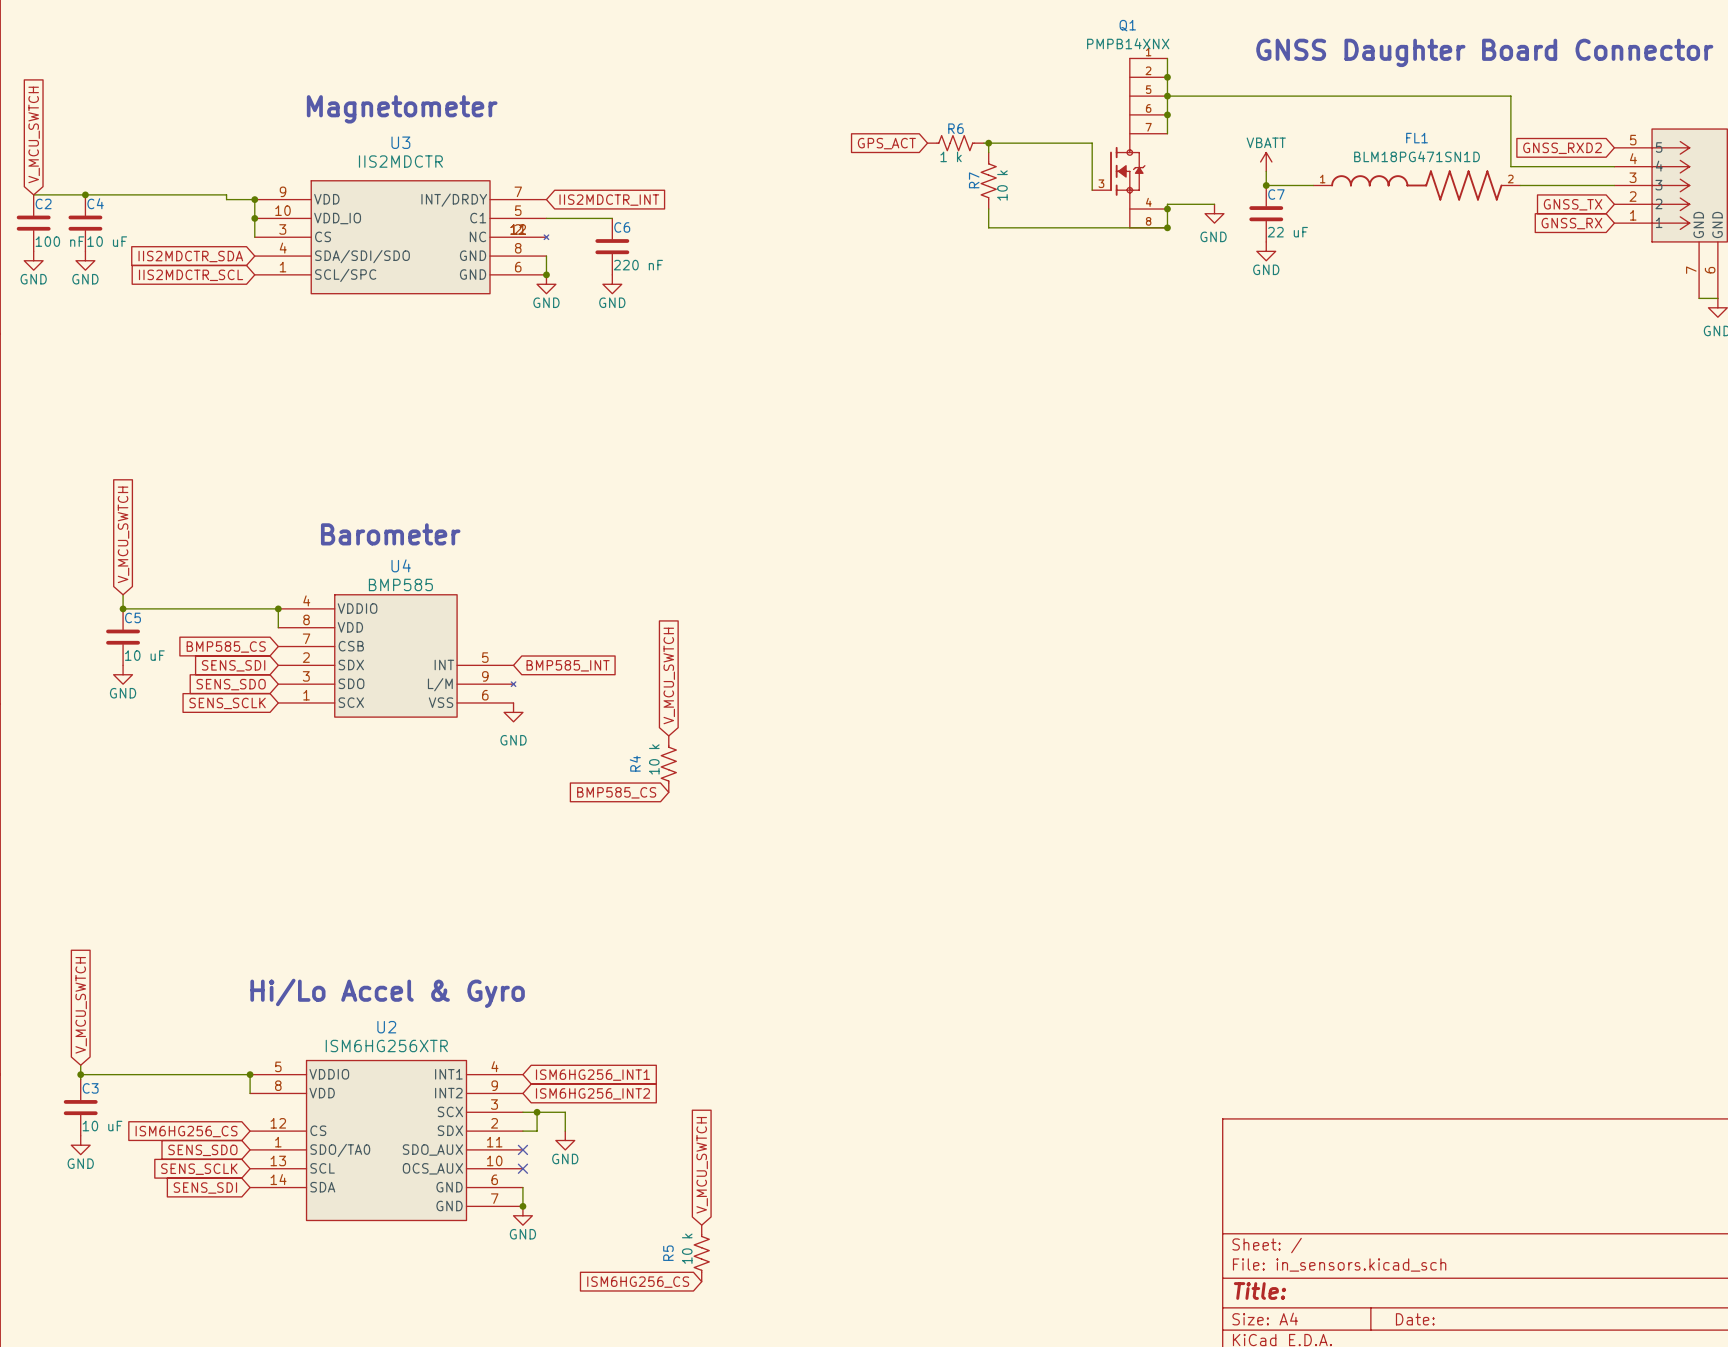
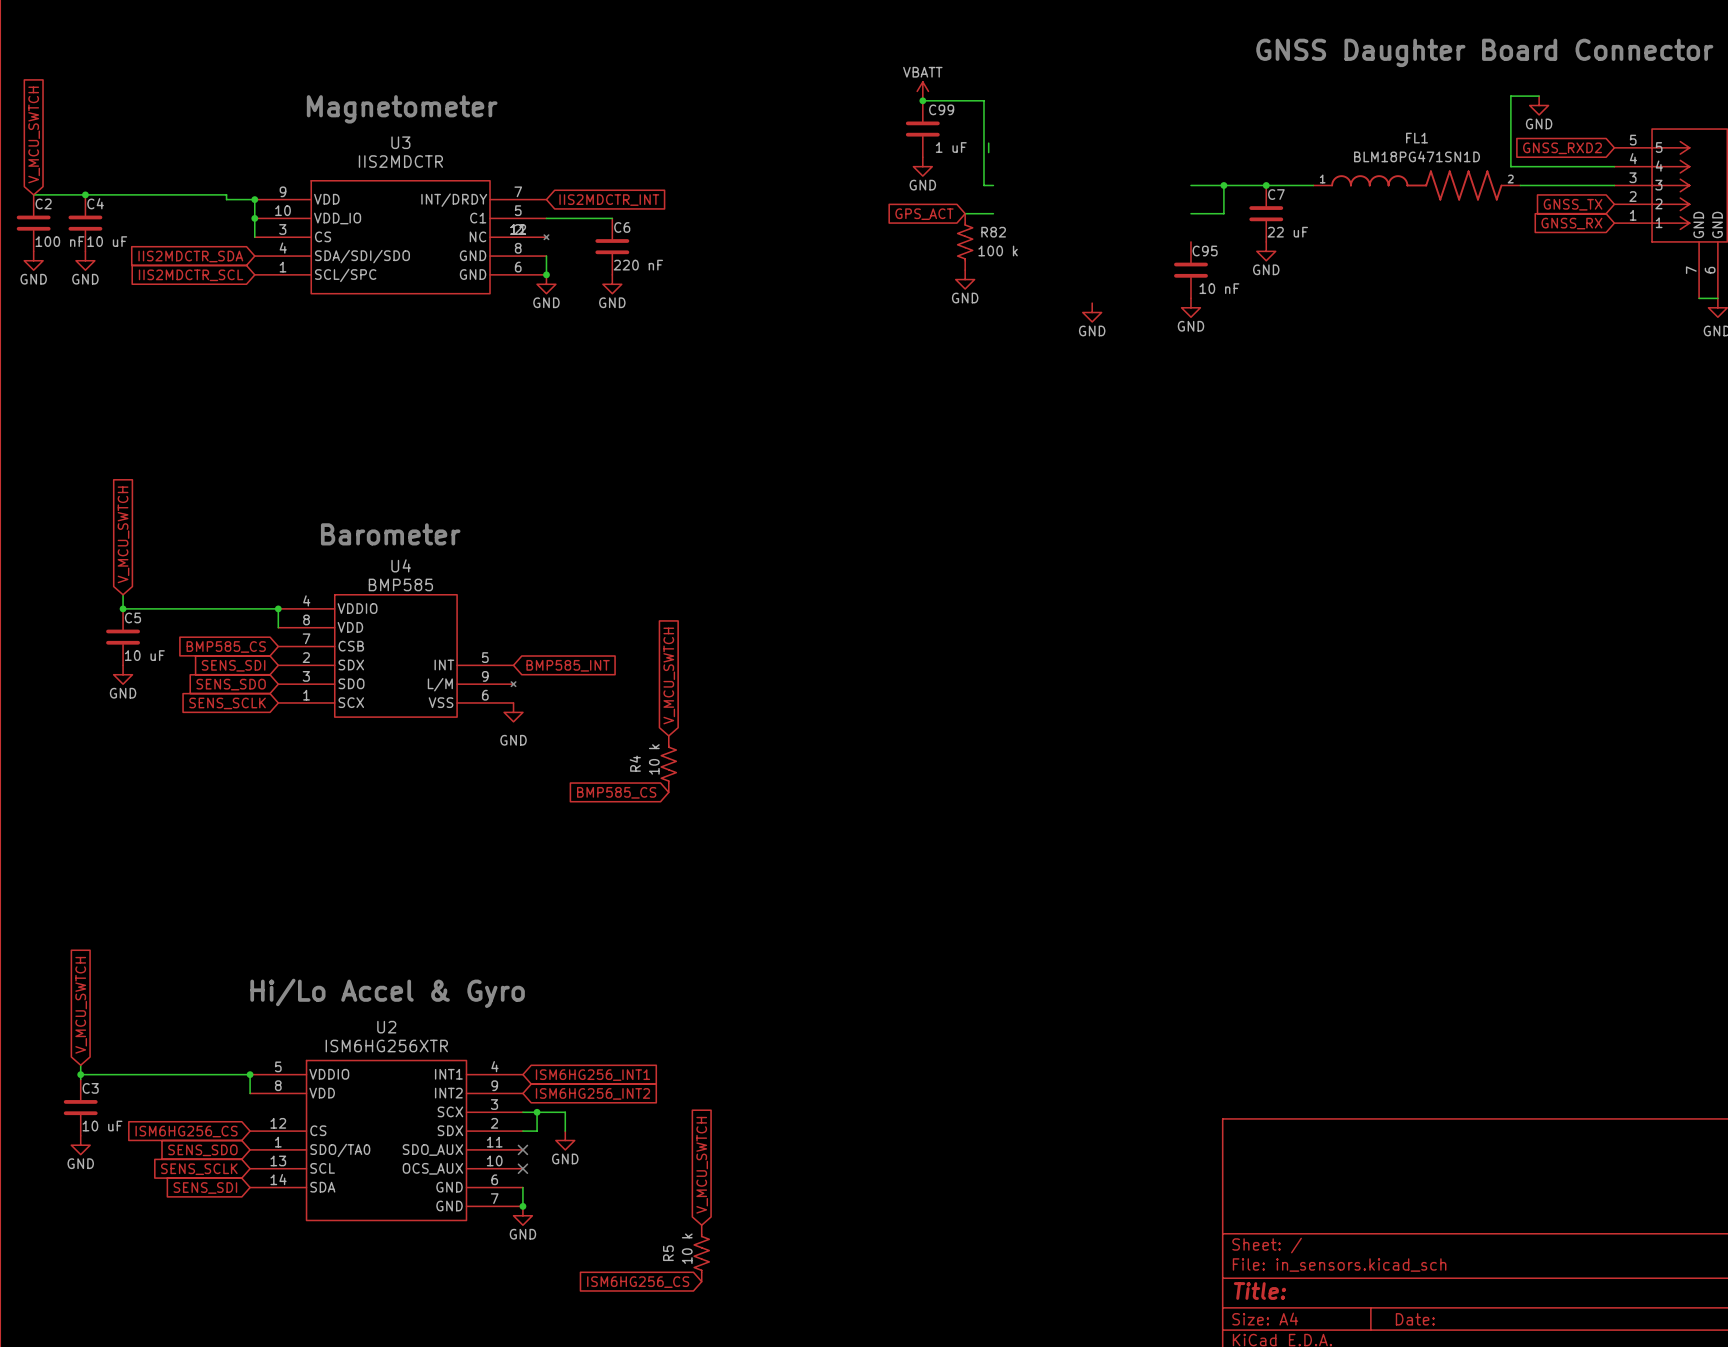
wire: (1167, 58) (1167, 133) -> none
junction: (1167, 77) -> none
power symbol: none -> VBATT (922, 91)
wire: (1167, 96) (1510, 96) -> (1539, 96) (1510, 96)
junction: (1167, 96) -> none
wire: none -> (922, 100) (983, 100) (983, 185) (993, 185)
junction: none -> (922, 100)
power symbol: none -> GND (1539, 105)
junction: (1167, 114) -> none
C99: none -> 1 uF (922, 129)
global label position: GPS_ACT (886, 143) -> GPS_ACT (924, 214)
R6: 1 k (955, 143) -> none
wire: (983, 143) (1092, 143) (1092, 190) -> none
junction: (988, 143) -> none
Q1: PMPB14XNX (1129, 143) -> none
power symbol: VBATT (1266, 161) -> none
power symbol: none -> GND (922, 166)
wire: (1266, 171) (1266, 185) -> (1190, 185) (1266, 185)
R7: 10 k (988, 180) -> none
wire: none -> (1223, 185) (1223, 213) (1190, 213)
junction: none -> (1223, 185)
wire: (1214, 204) (1167, 204) (1167, 227) (988, 227) (988, 209) -> none
junction: (1167, 209) -> none
wire: none -> (965, 213) (993, 213)
power symbol: GND (1214, 213) -> none
junction: (1167, 227) -> none
R82: none -> 100 k (965, 241)
C95: none -> 10 nF (1190, 270)
power symbol: none -> GND (965, 279)
power symbol: none -> GND (1190, 307)
power symbol: none -> GND (1092, 312)

